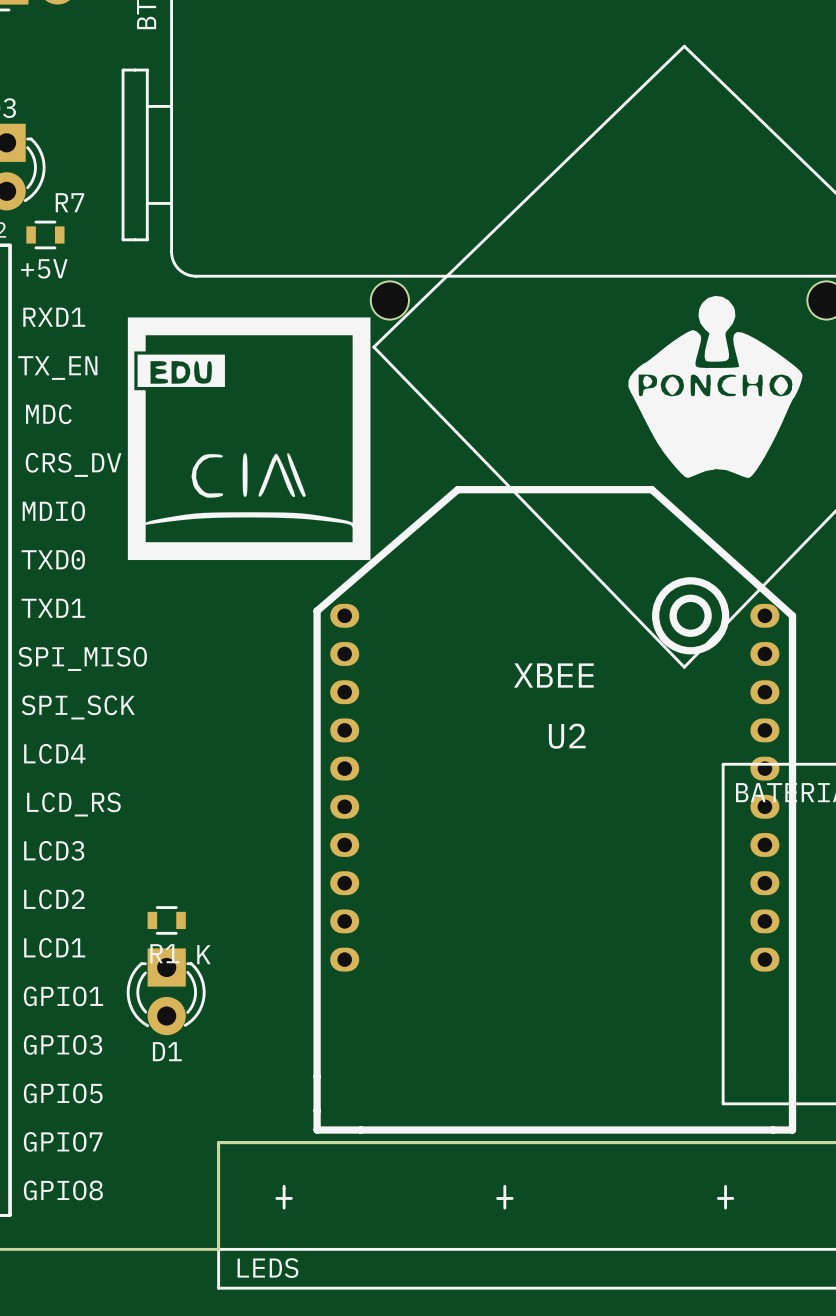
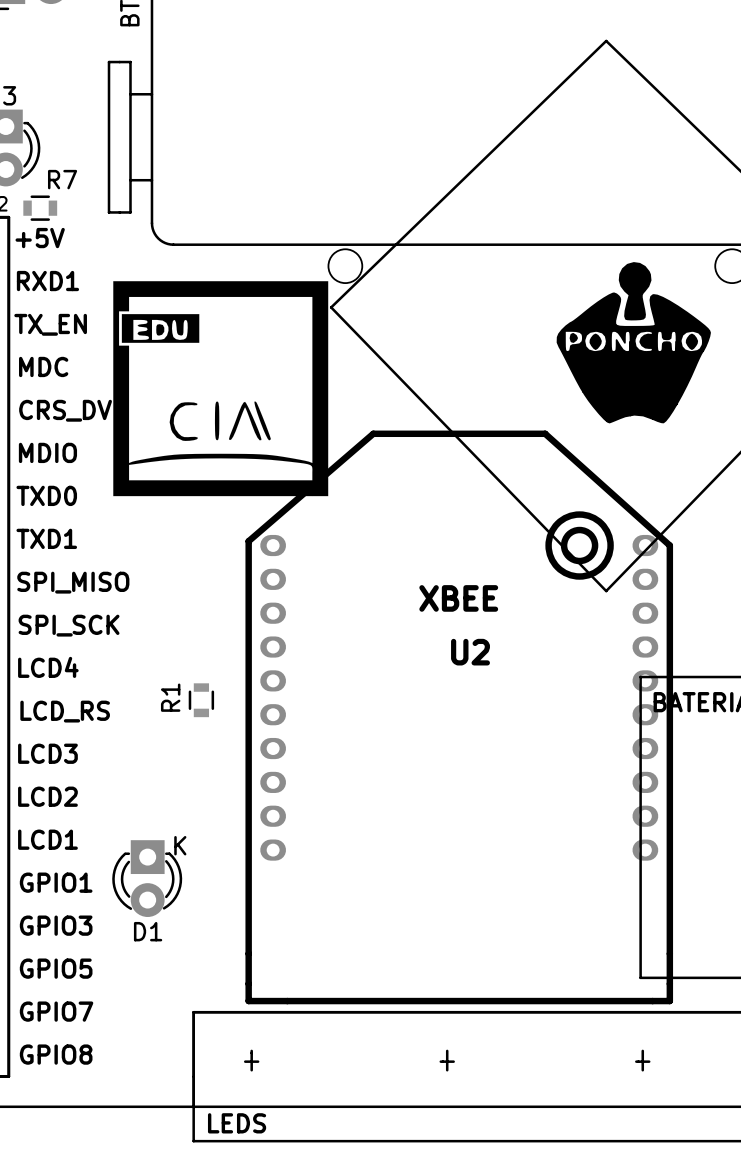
U2 position: (554, 809) -> (459, 717)
R1 rotation: 0° (166, 920) -> 90° clockwise (201, 700)
R1 position: (166, 920) -> (201, 700)

